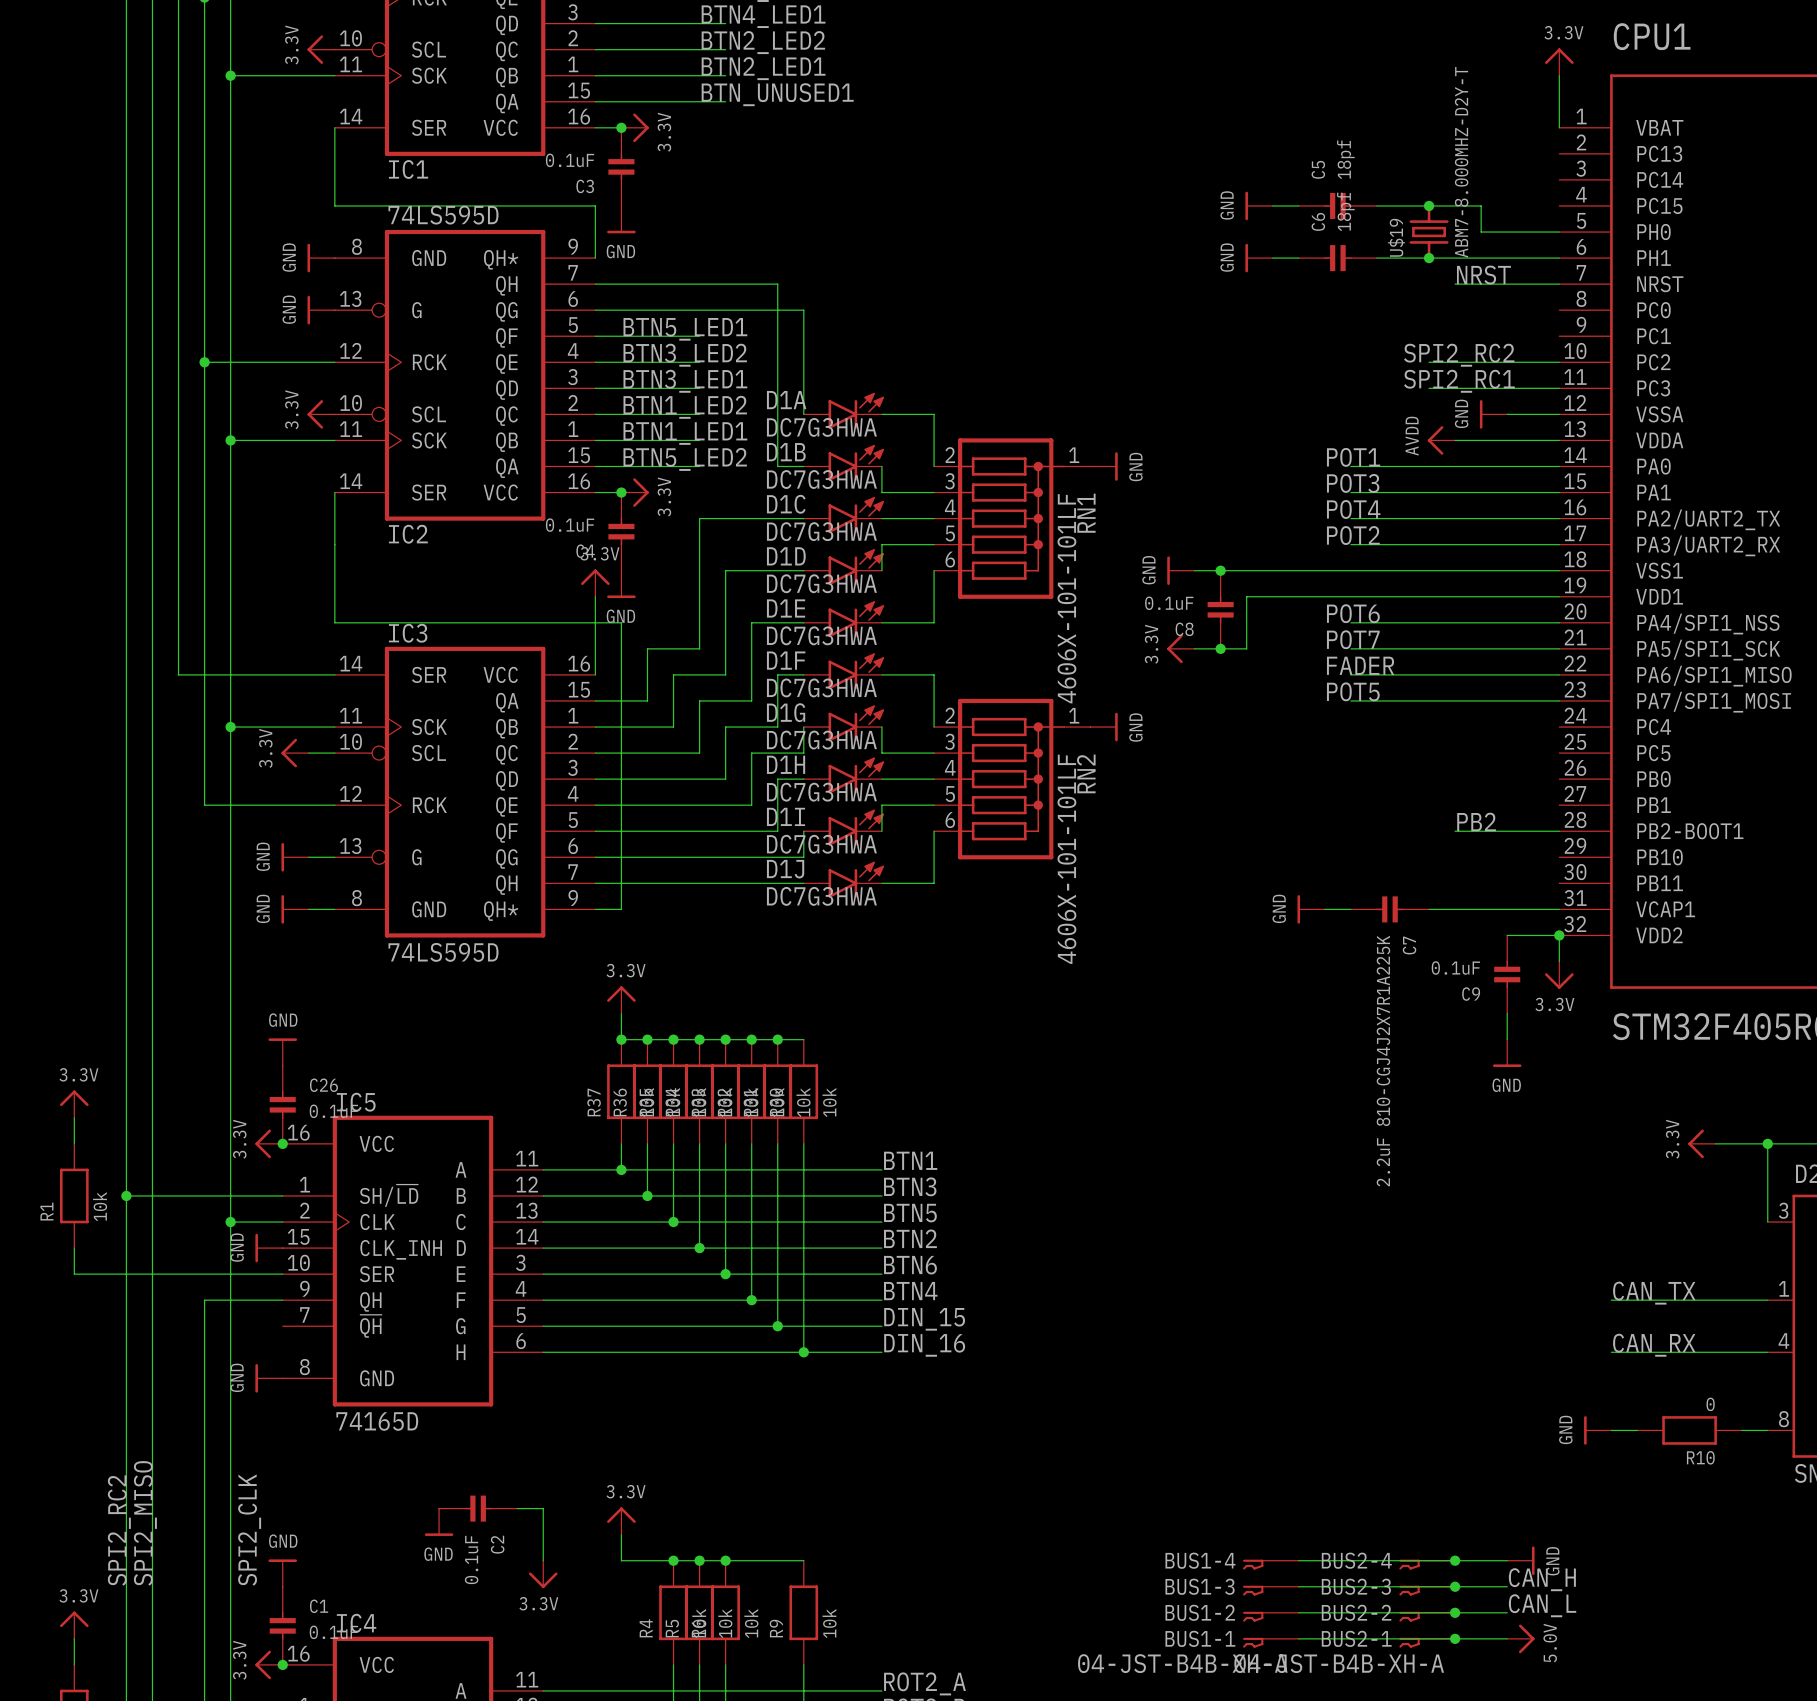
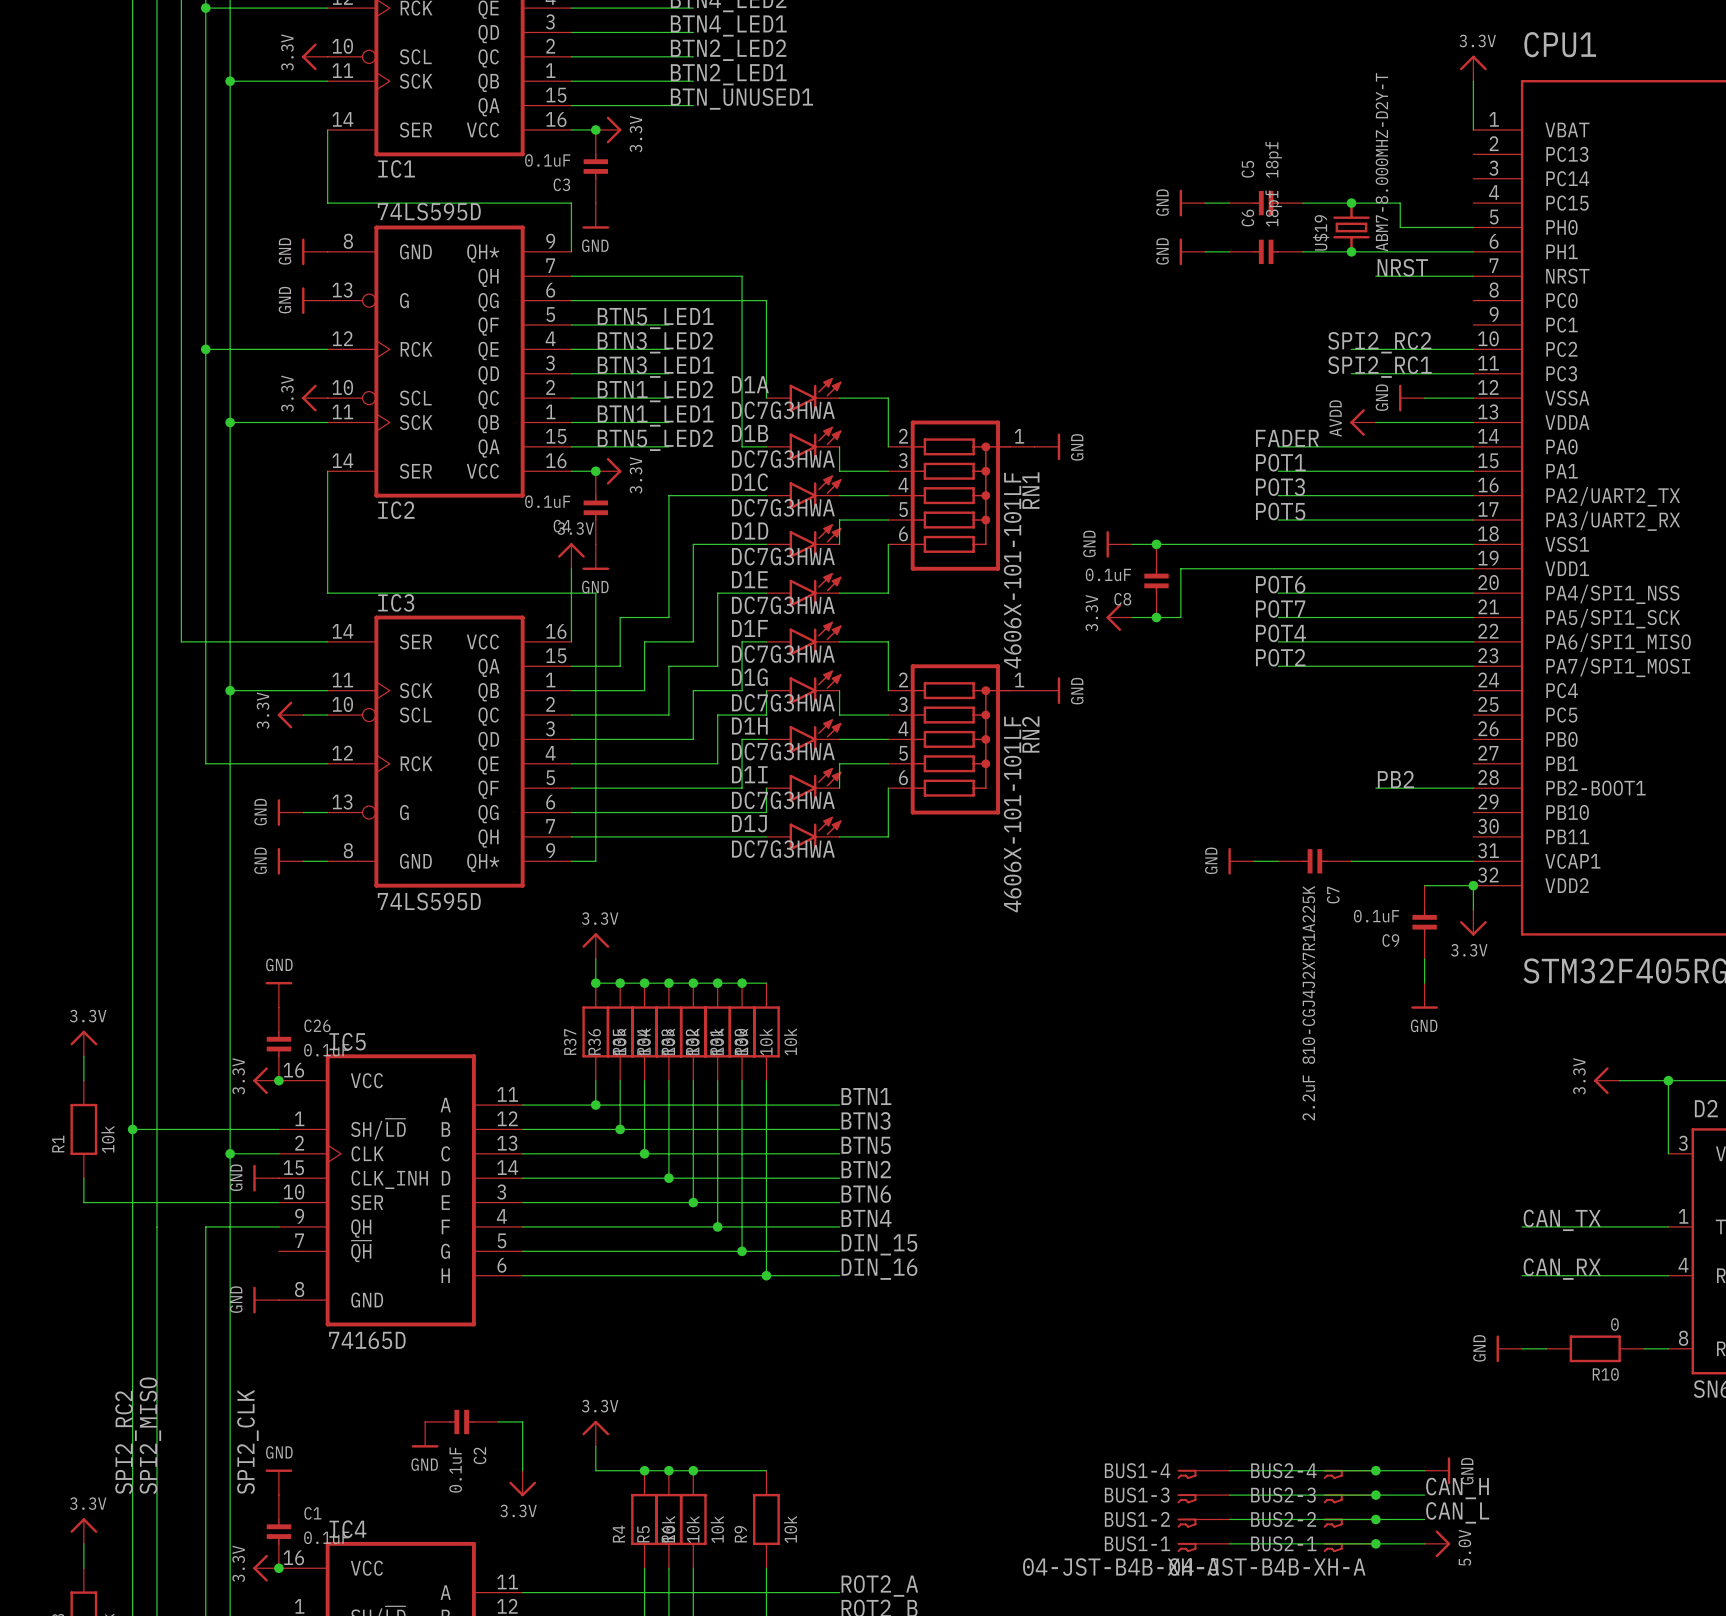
label: POT1 (1353, 457) -> FADER (1287, 438)
label: POT3 (1353, 483) -> POT1 (1280, 462)
label: POT4 (1353, 509) -> POT3 (1280, 487)
label: POT2 (1353, 535) -> POT5 (1280, 511)
label: FADER (1360, 665) -> POT4 (1280, 633)
label: POT5 (1353, 691) -> POT2 (1280, 657)

